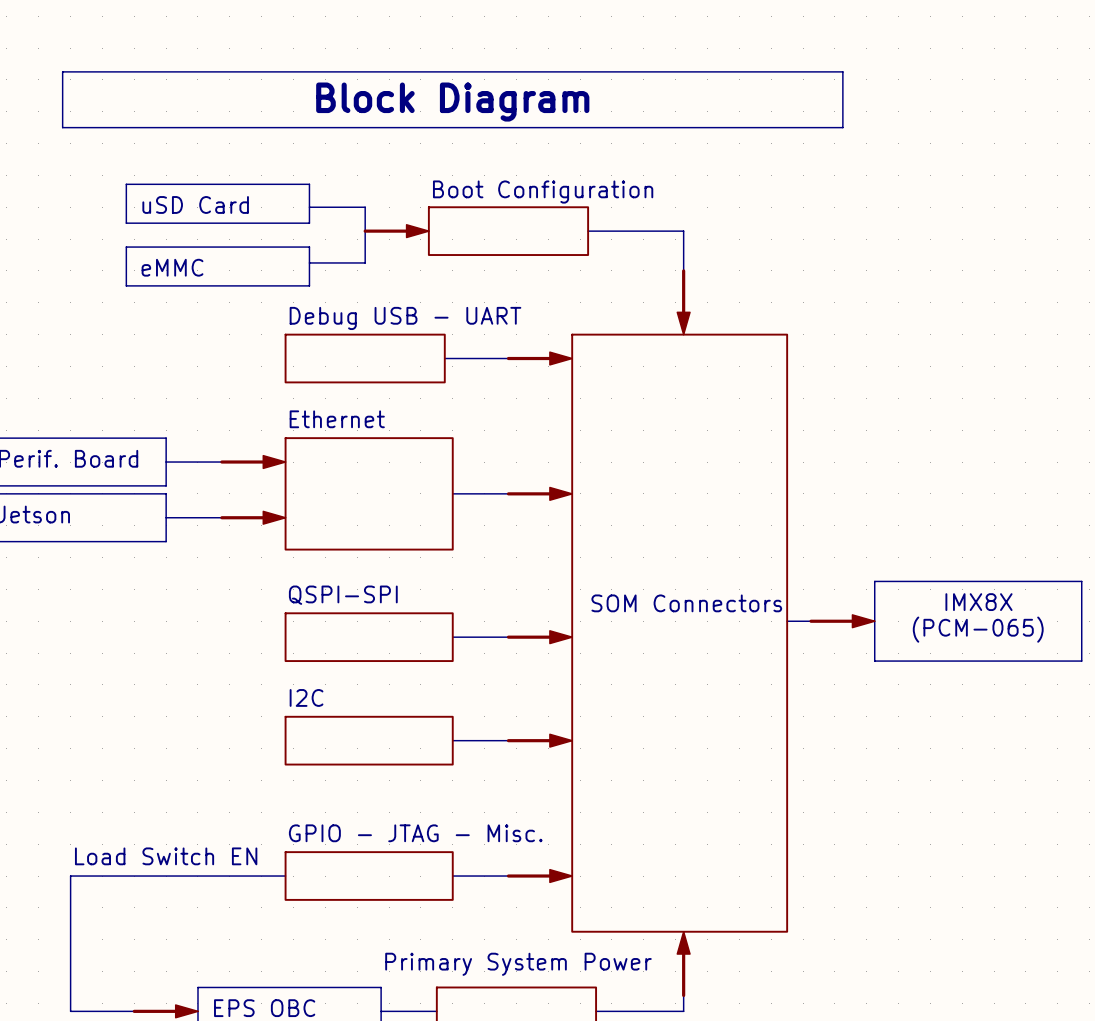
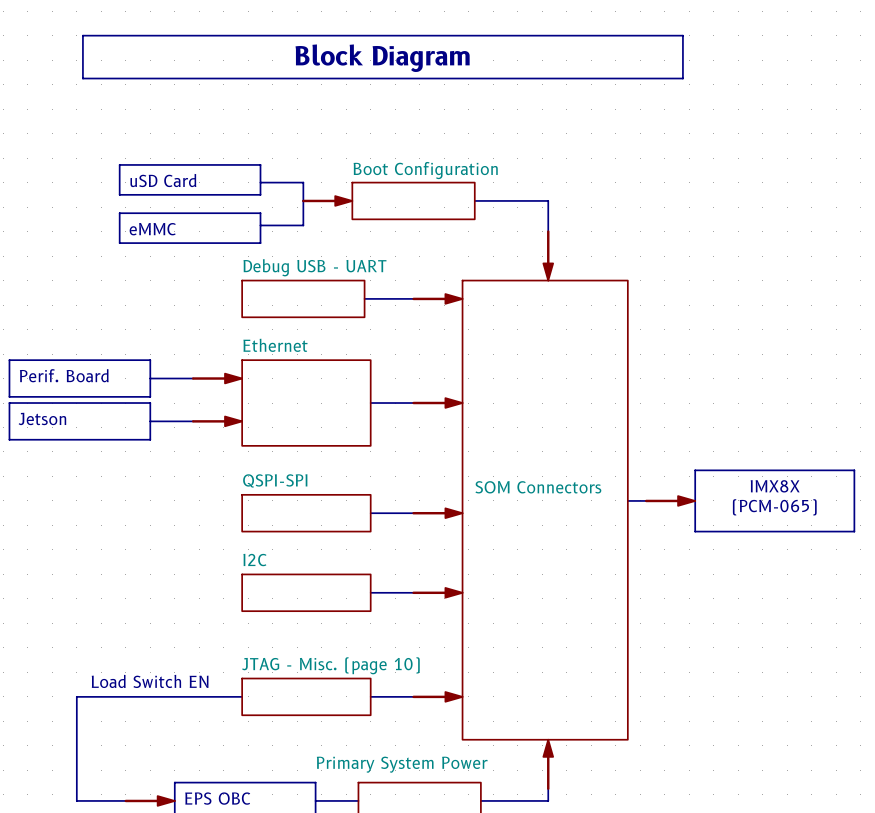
line: (78, 71) (62, 71) (62, 127) (842, 127) (842, 71) -> (82, 78) (82, 35) (682, 35) (682, 78) (670, 78)
text position: Block Diagram (452, 102) -> Block Diagram (382, 58)
sheet GPIO - JTAG - Misc. name: GPIO - JTAG - Misc. (415, 833) -> JTAG - Misc. (page 10) (330, 665)

